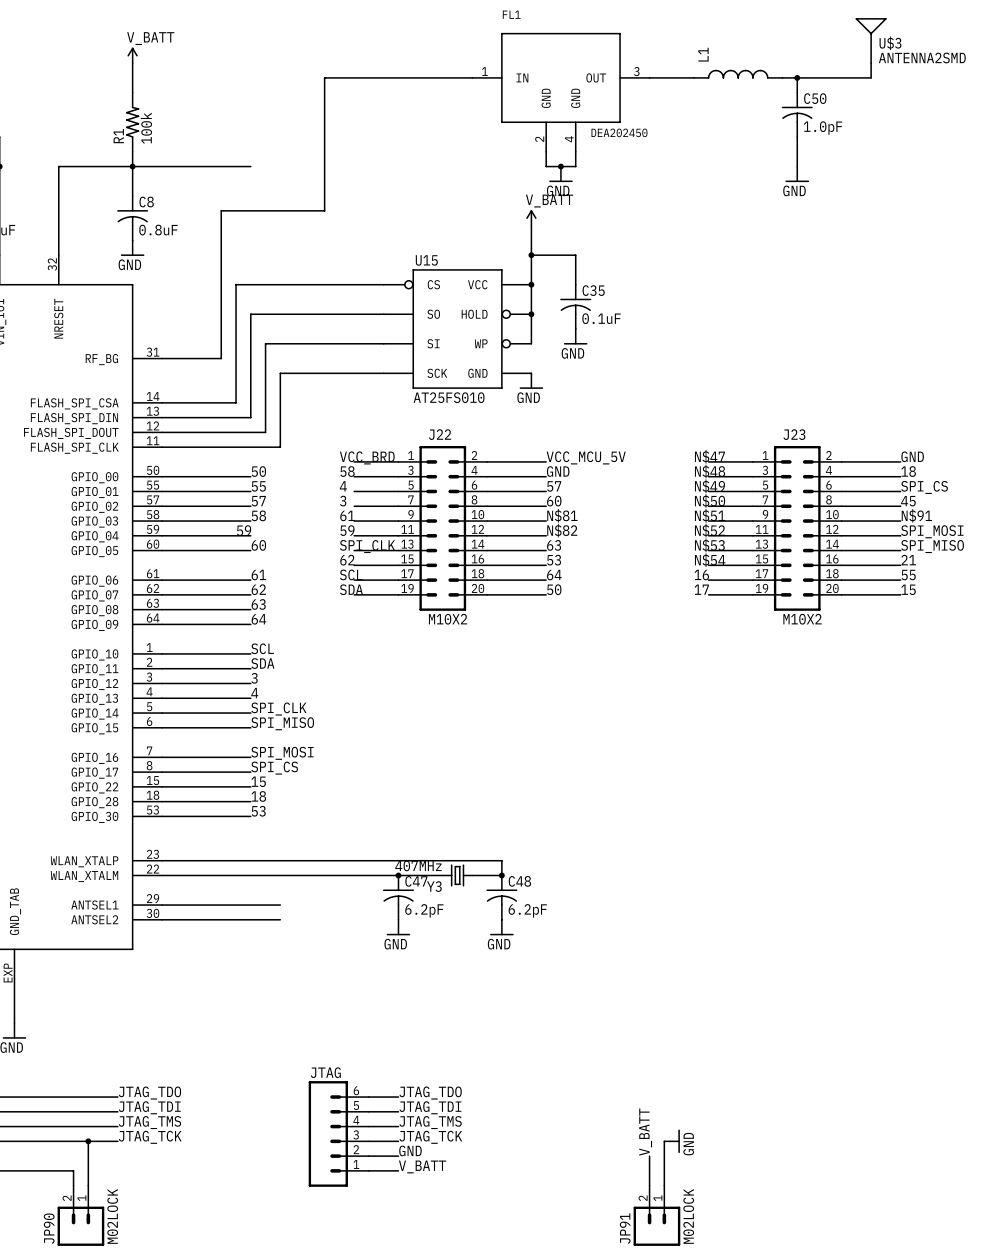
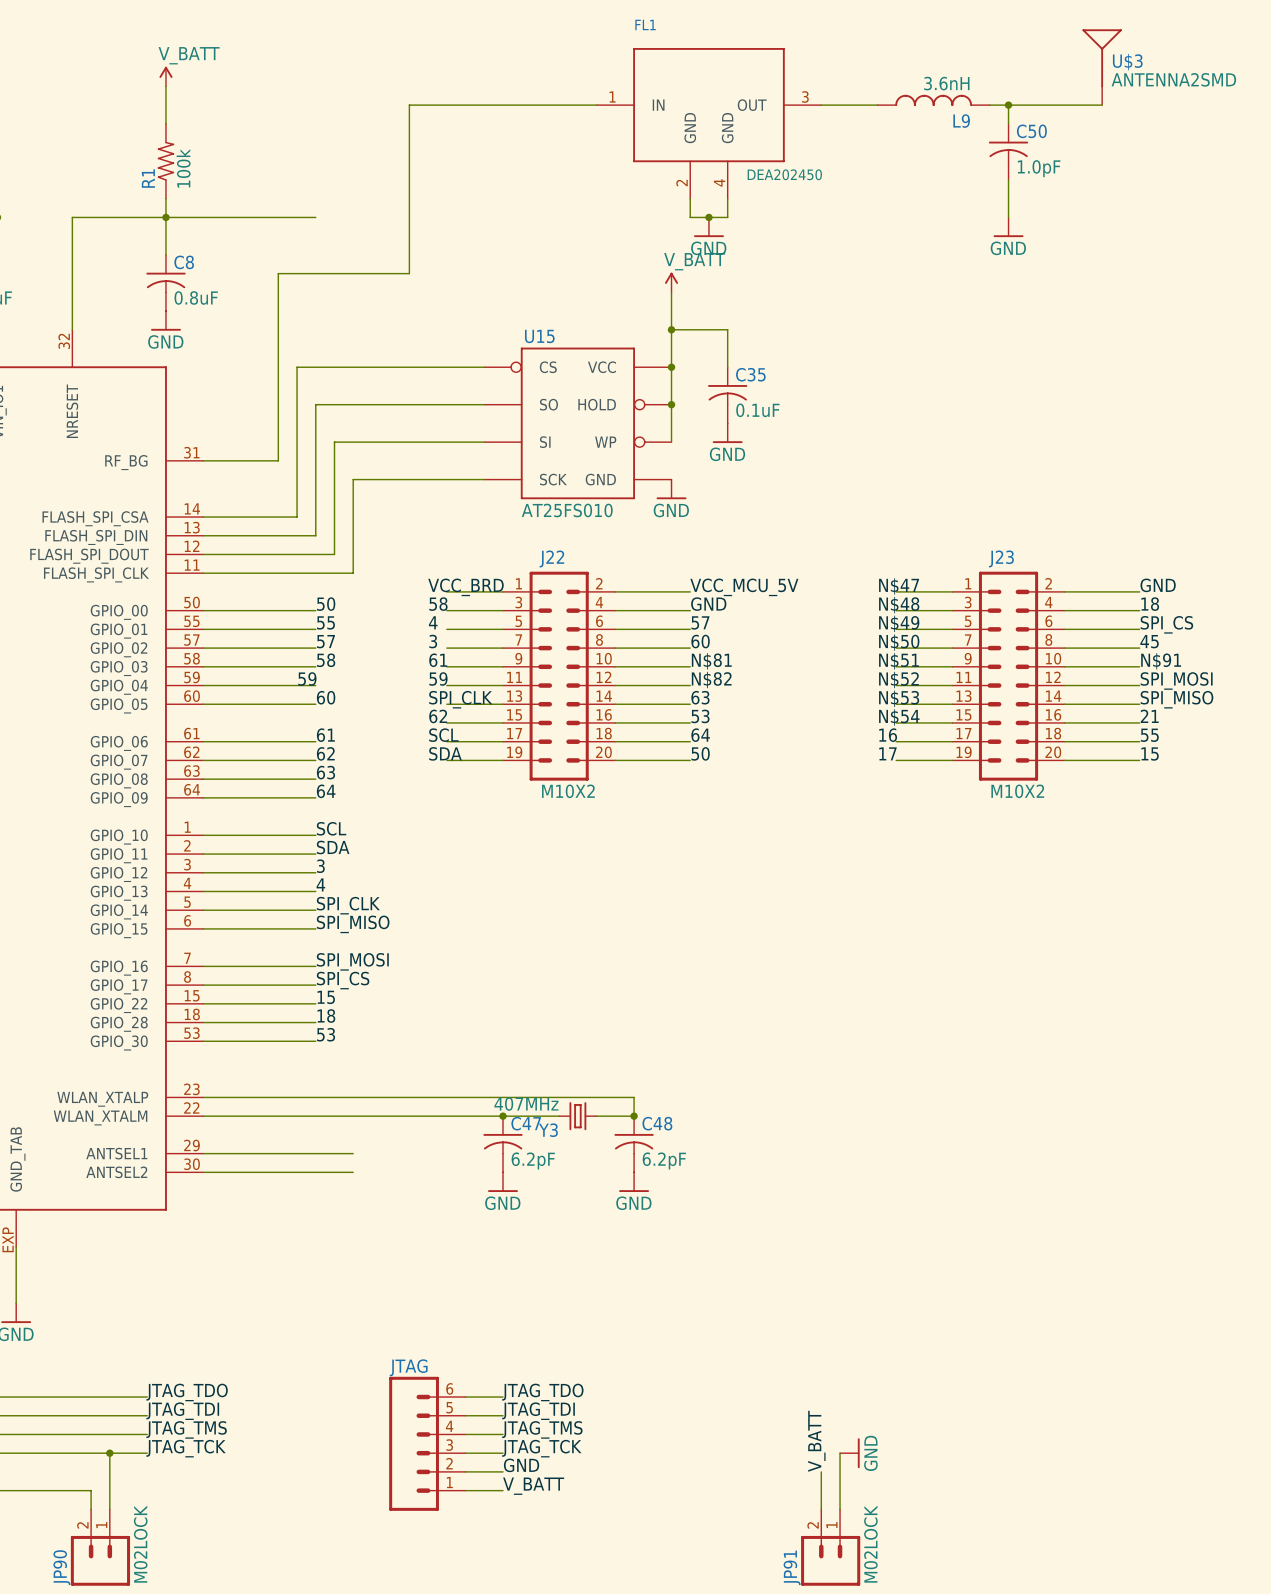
L1 name: L1 (703, 54) -> L9 (961, 121)
L1 value: none -> 3.6nH (946, 83)

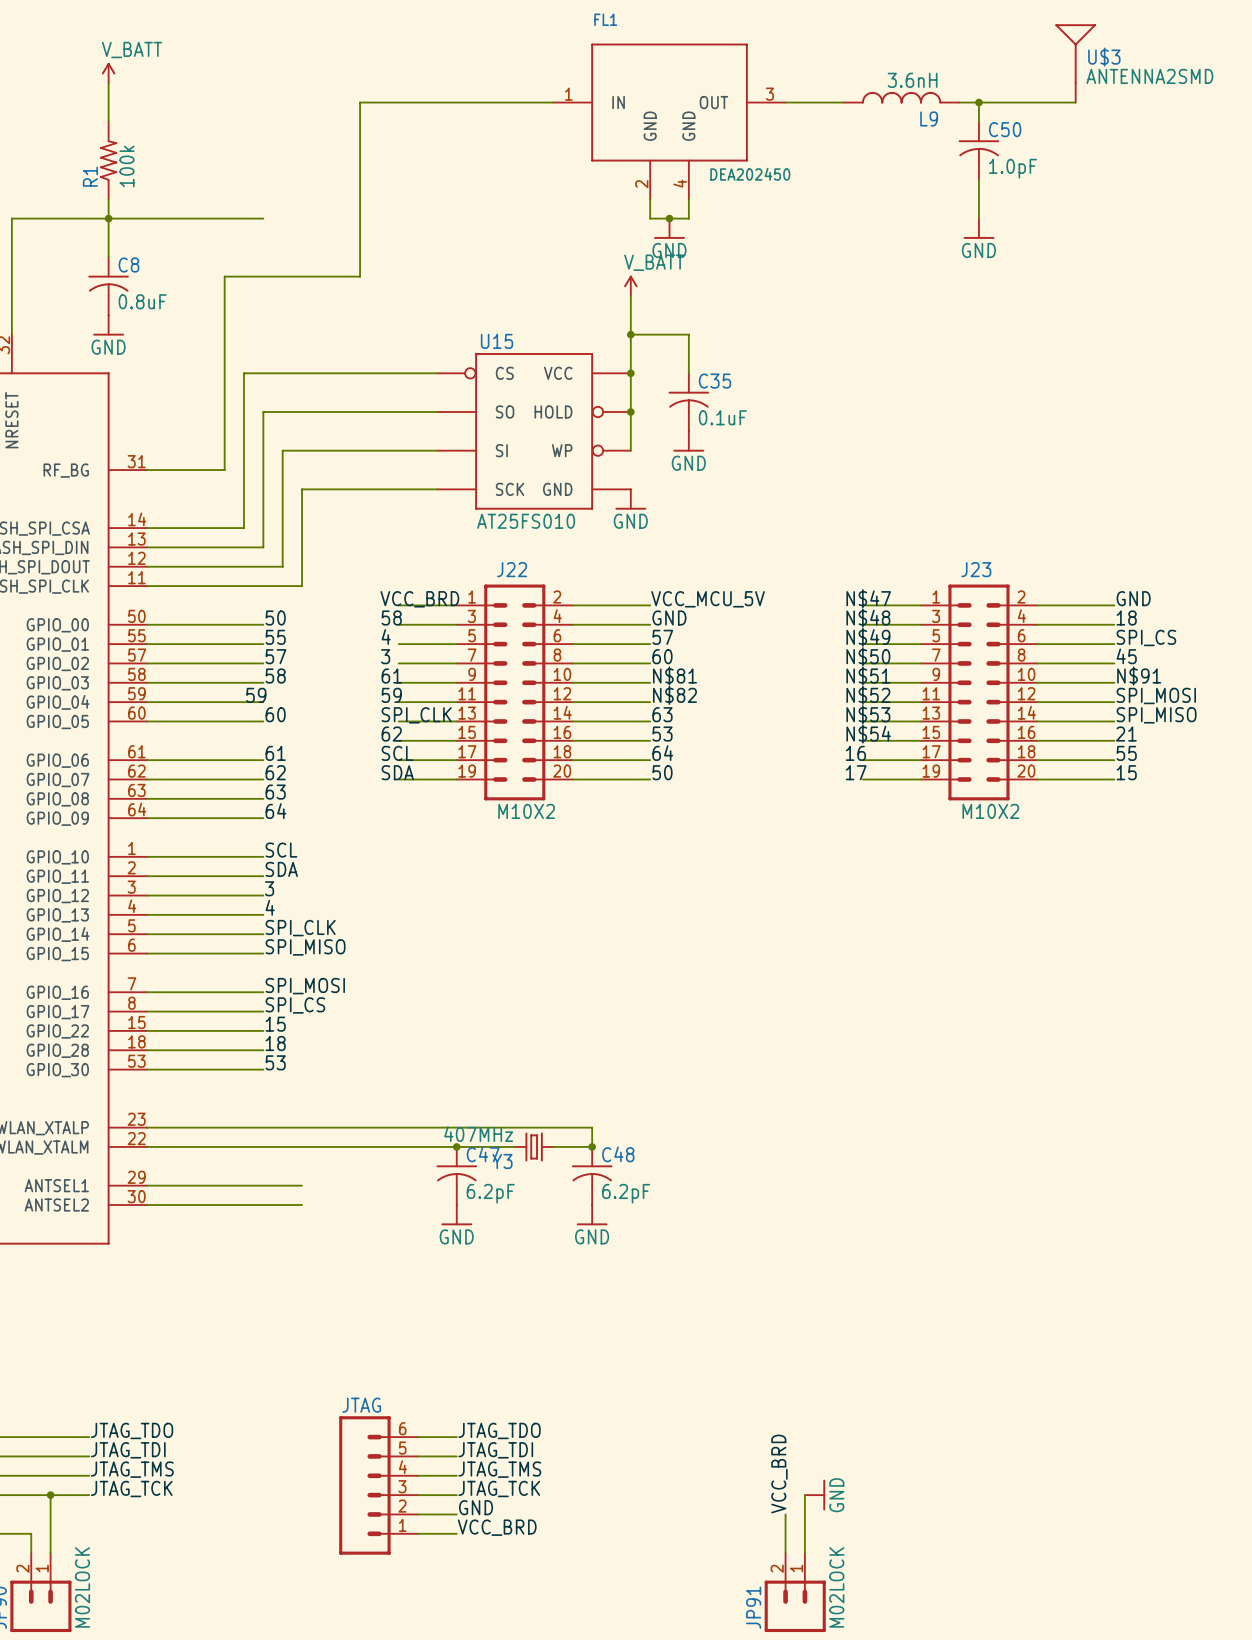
label: V_BATT (816, 1441) -> VCC_BRD (779, 1474)
label: V_BATT (533, 1486) -> VCC_BRD (497, 1527)

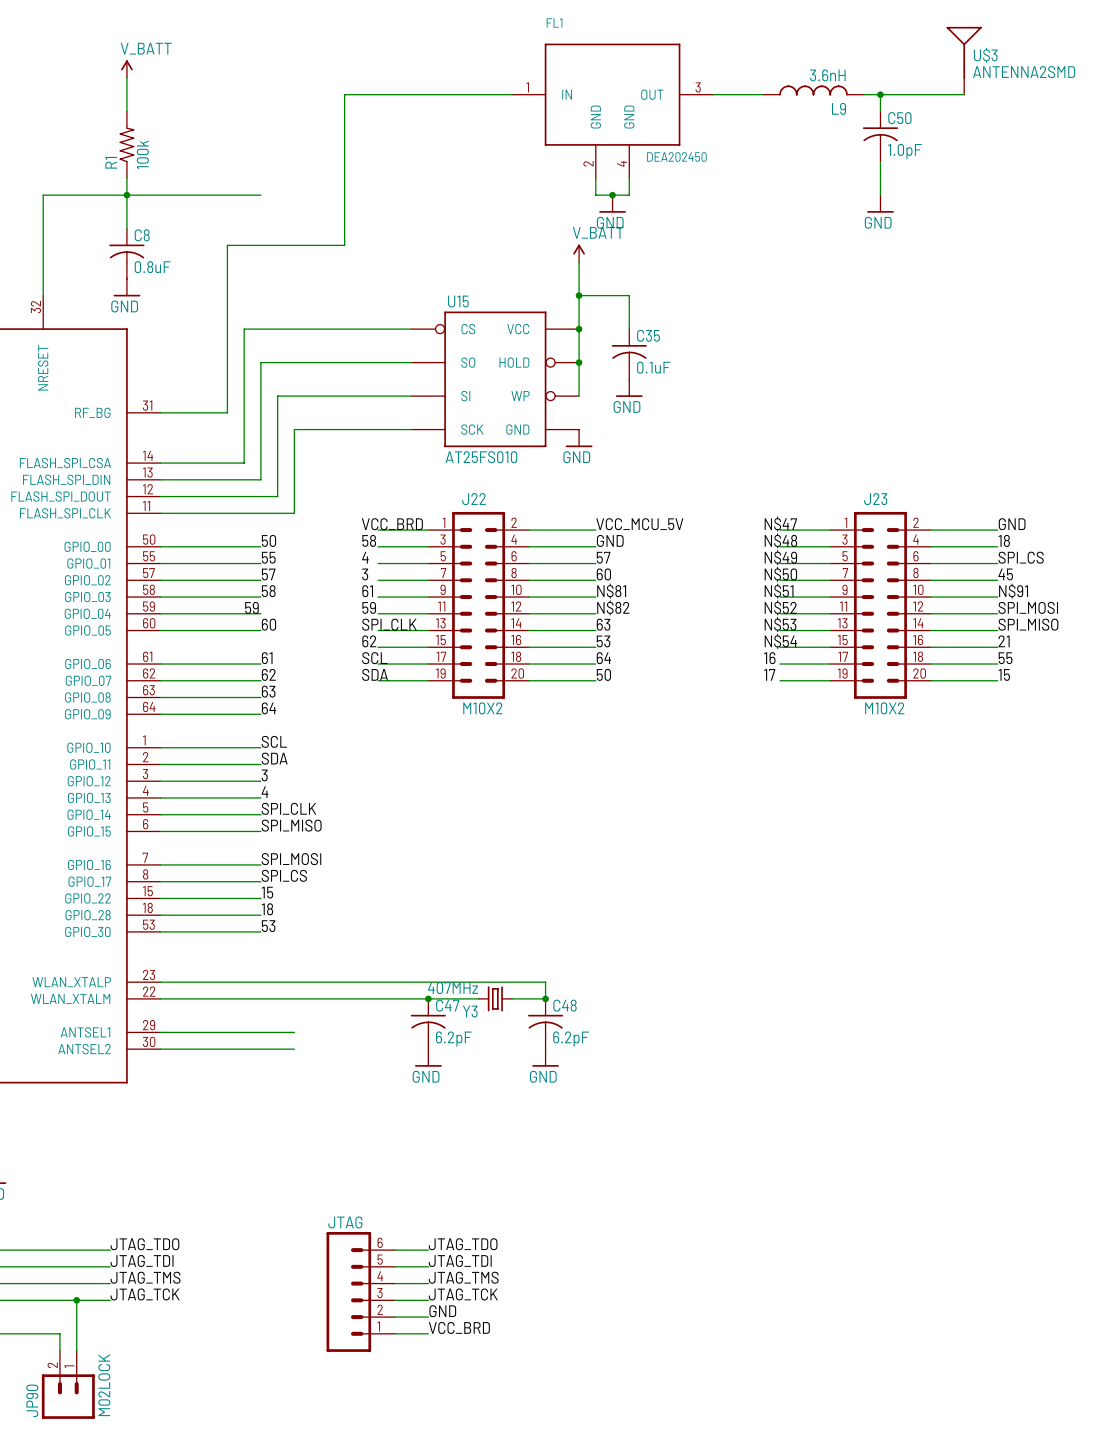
label: VCC_BRD (779, 1474) -> none
wire: (804, 1495) (804, 1553) -> none
power symbol: GND (815, 1495) -> none
wire: (785, 1514) (785, 1553) -> none
JP91: M02LOCK (795, 1592) -> none

